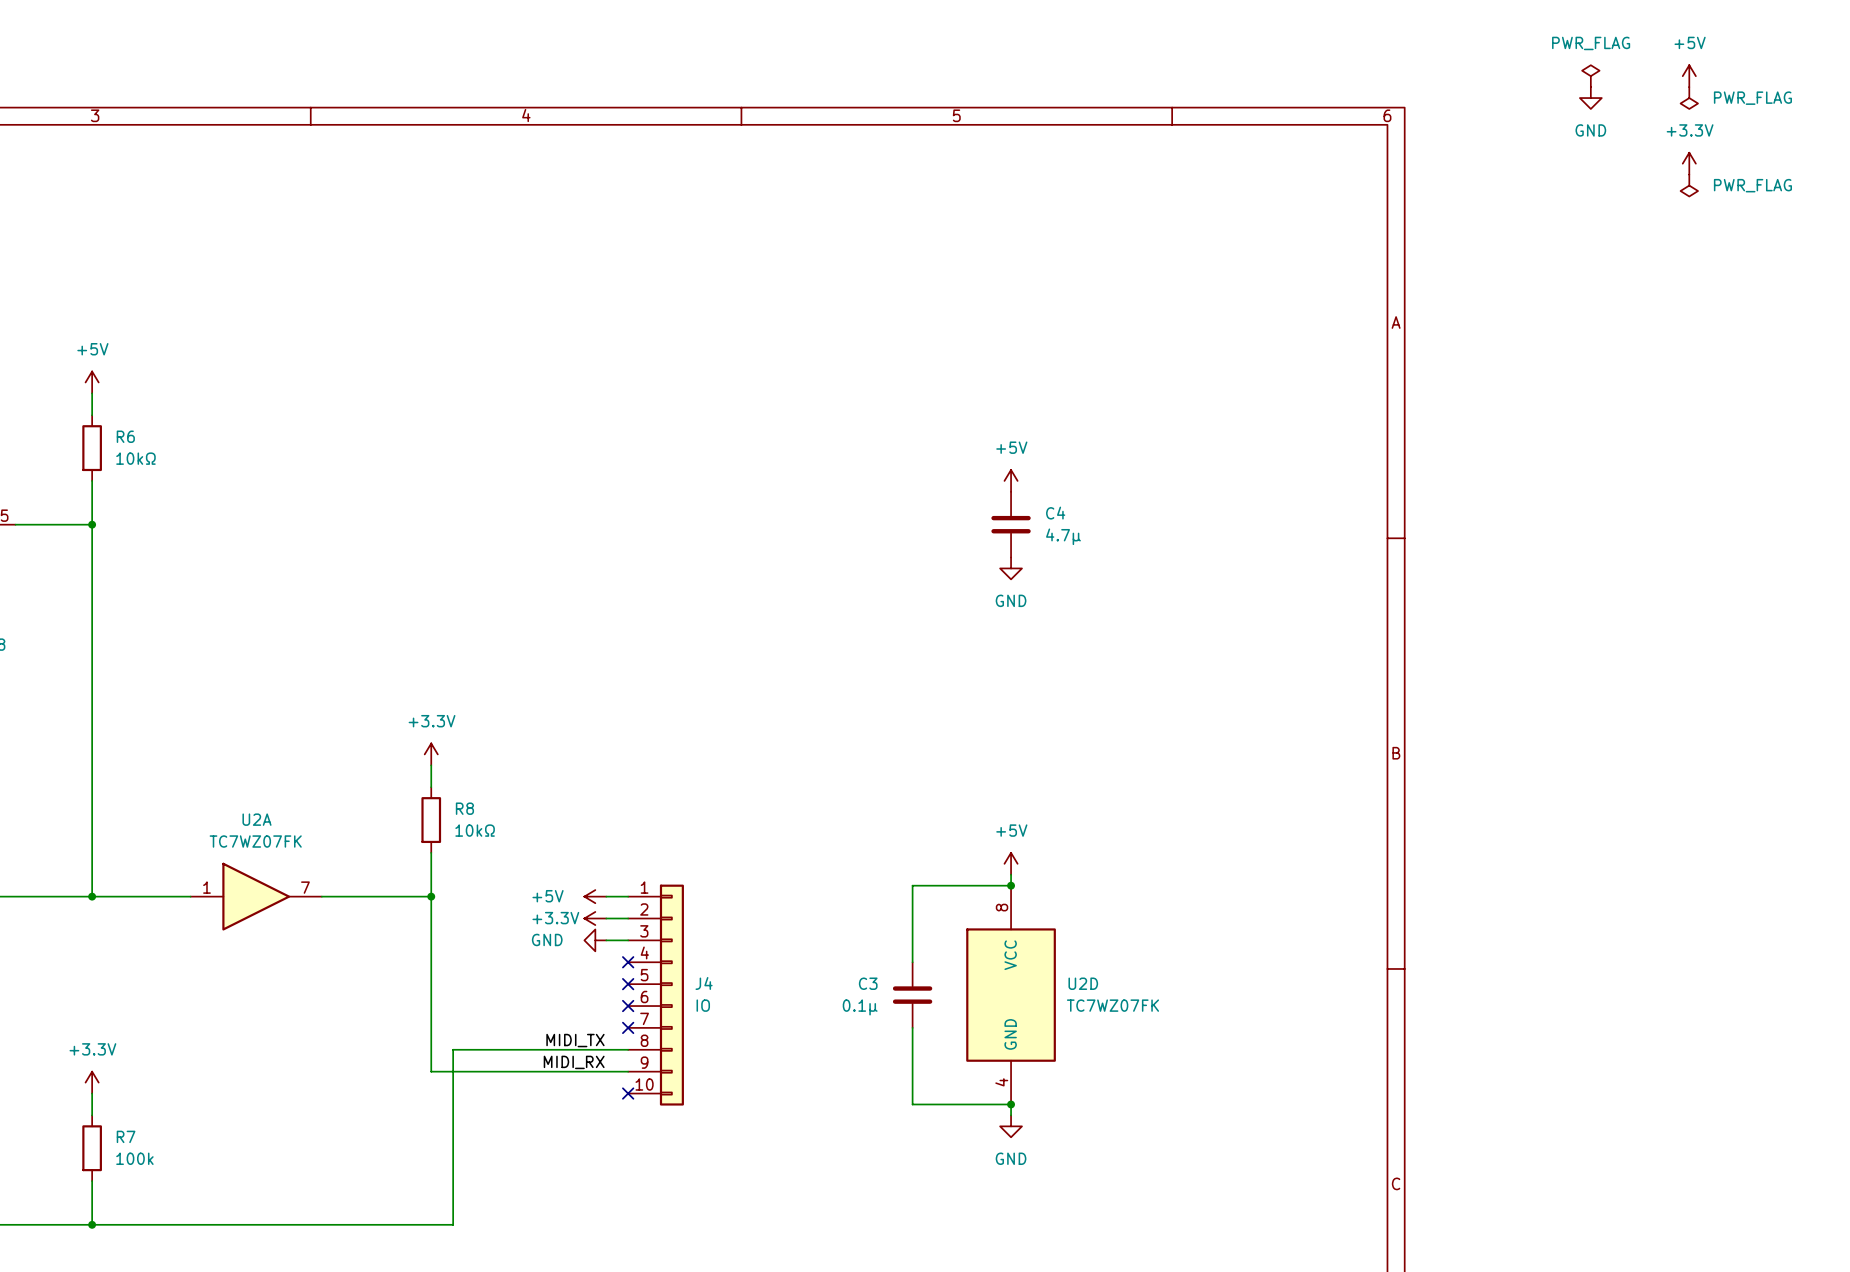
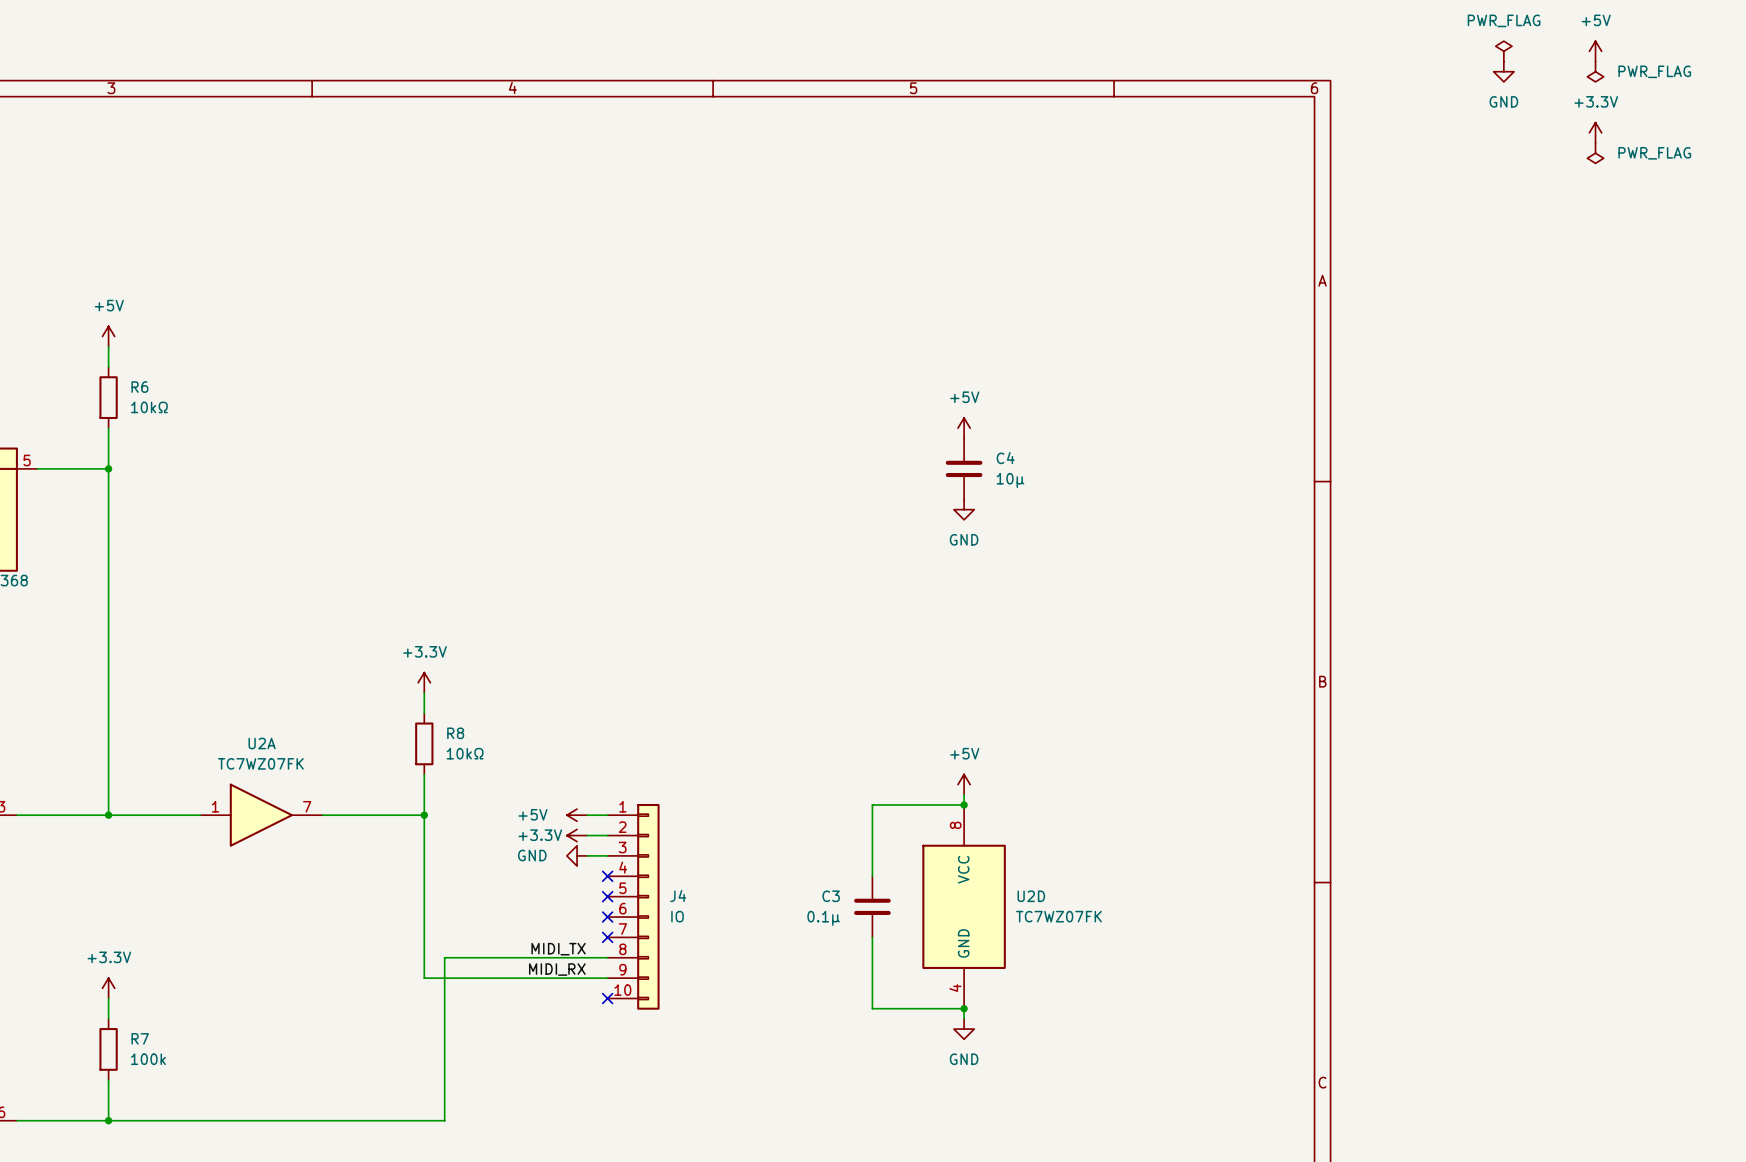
C4 value: 4.7μ (1063, 536) -> 10μ (1010, 480)

